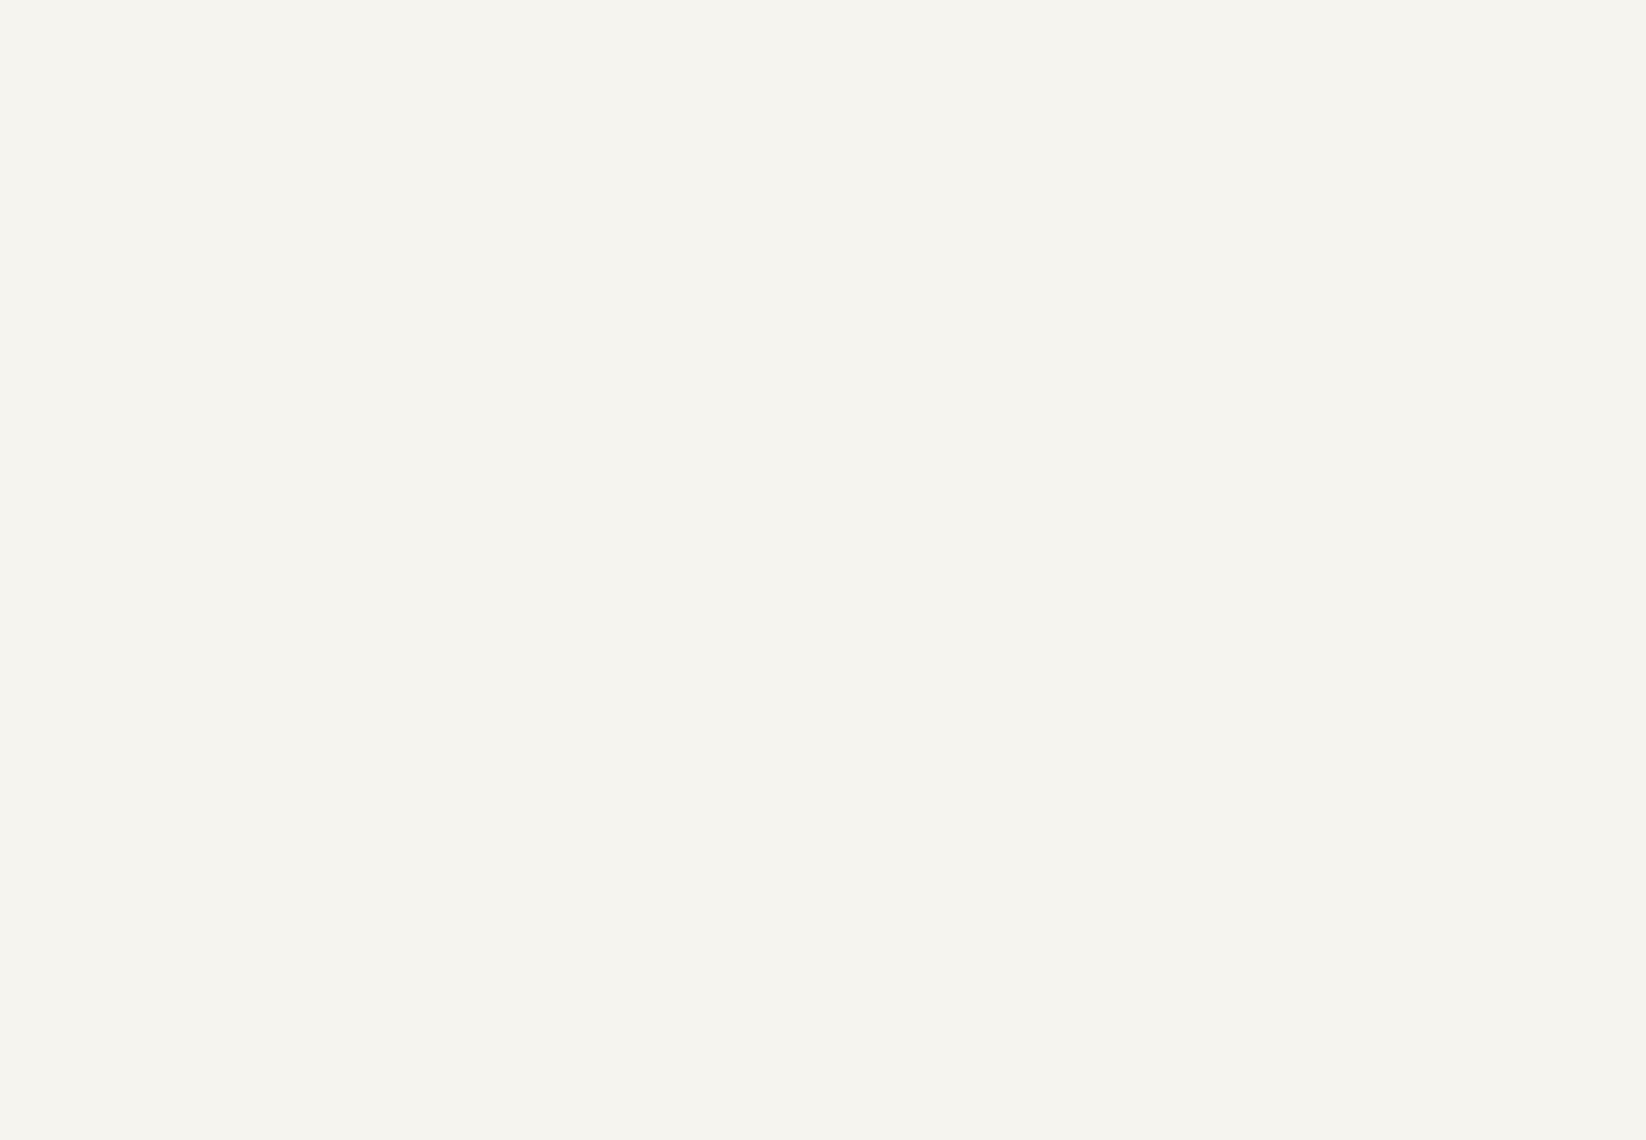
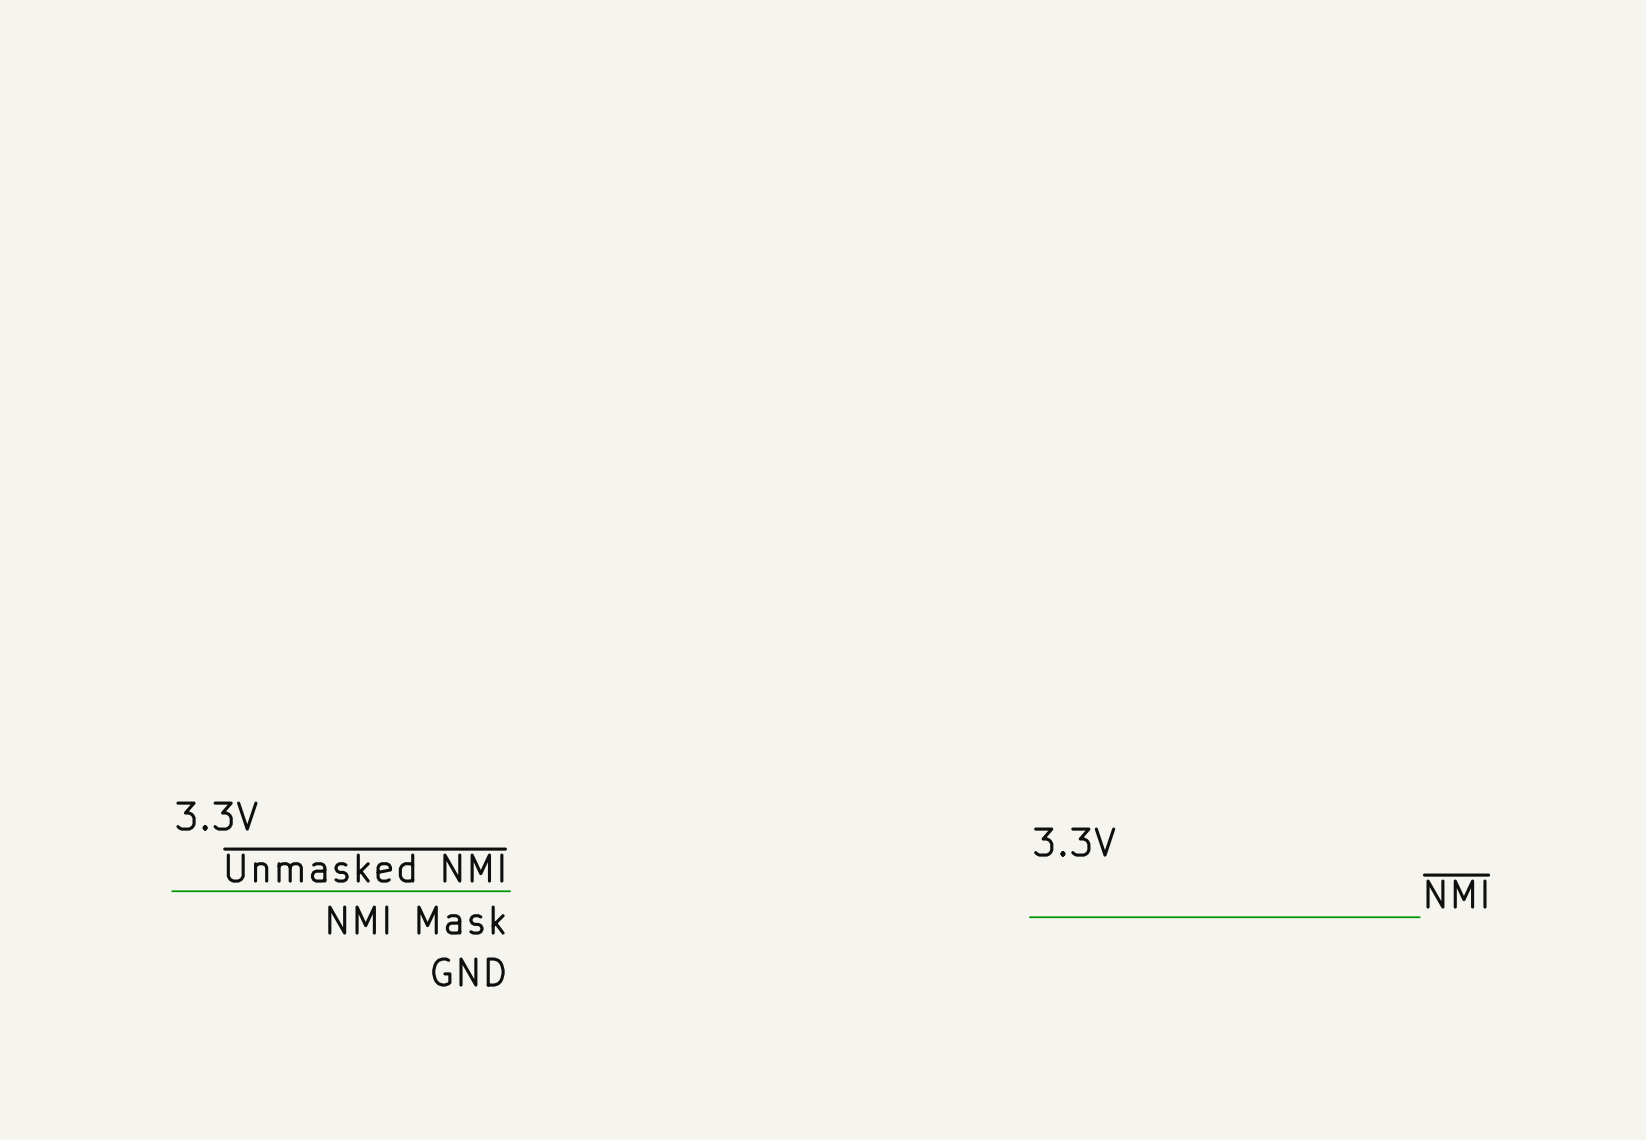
label: none -> 3.3V (216, 816)
label: none -> 3.3V (1074, 842)
label: none -> ~{Unmasked NMI} (365, 865)
wire: none -> (172, 891) (510, 891)
label: none -> ~{NMI} (1456, 891)
wire: none -> (1029, 917) (1419, 917)
label: none -> NMI Mask (416, 920)
label: none -> GND (468, 972)

